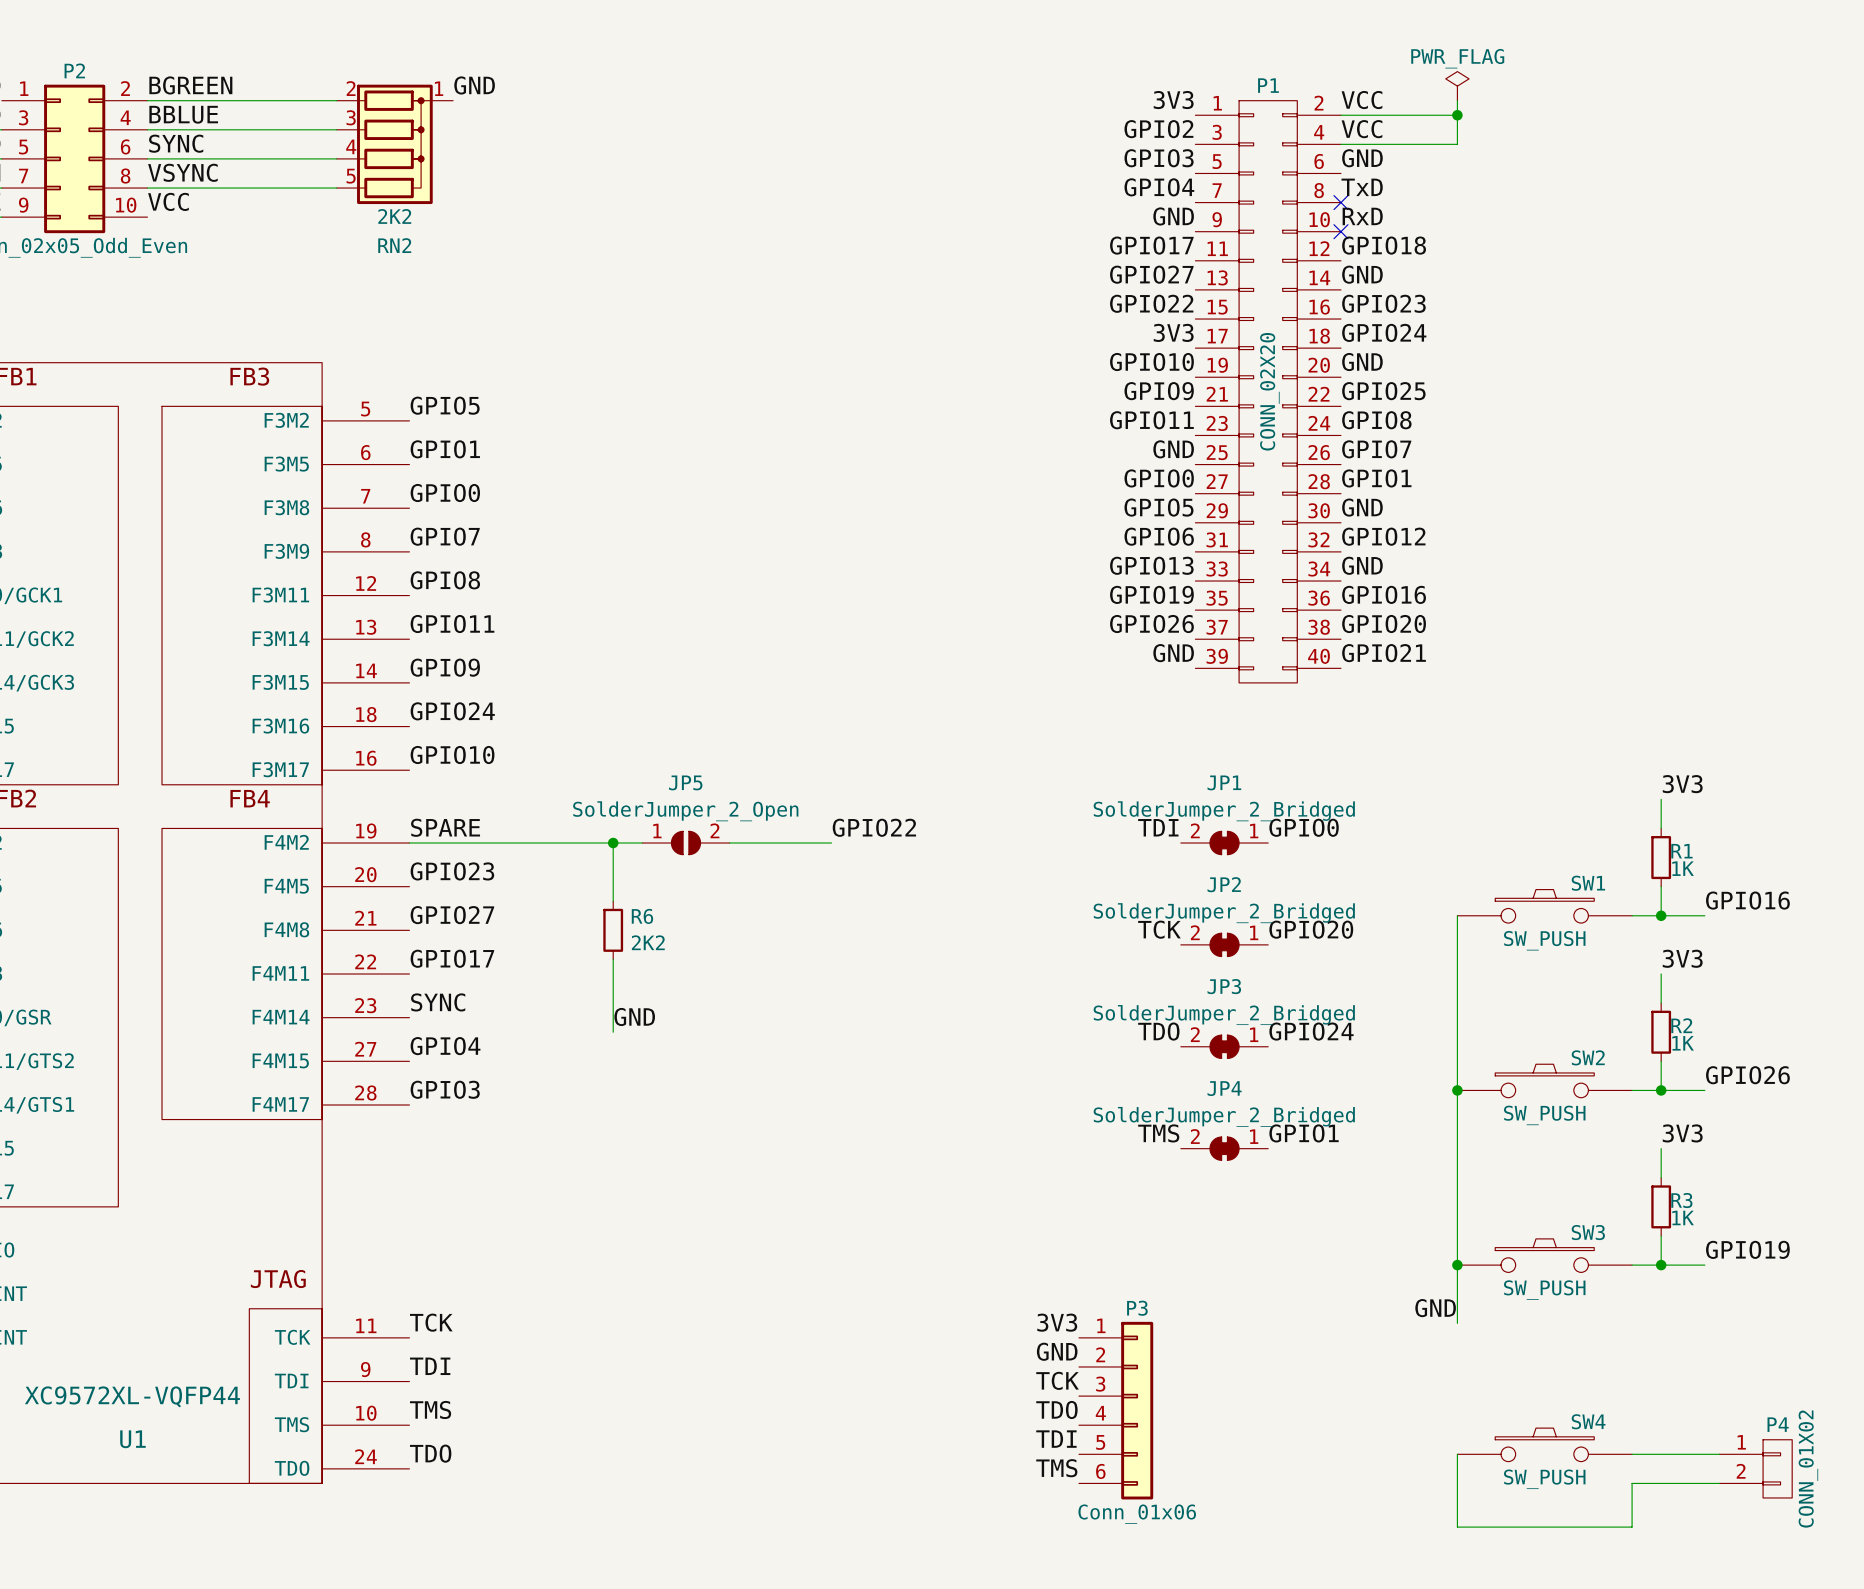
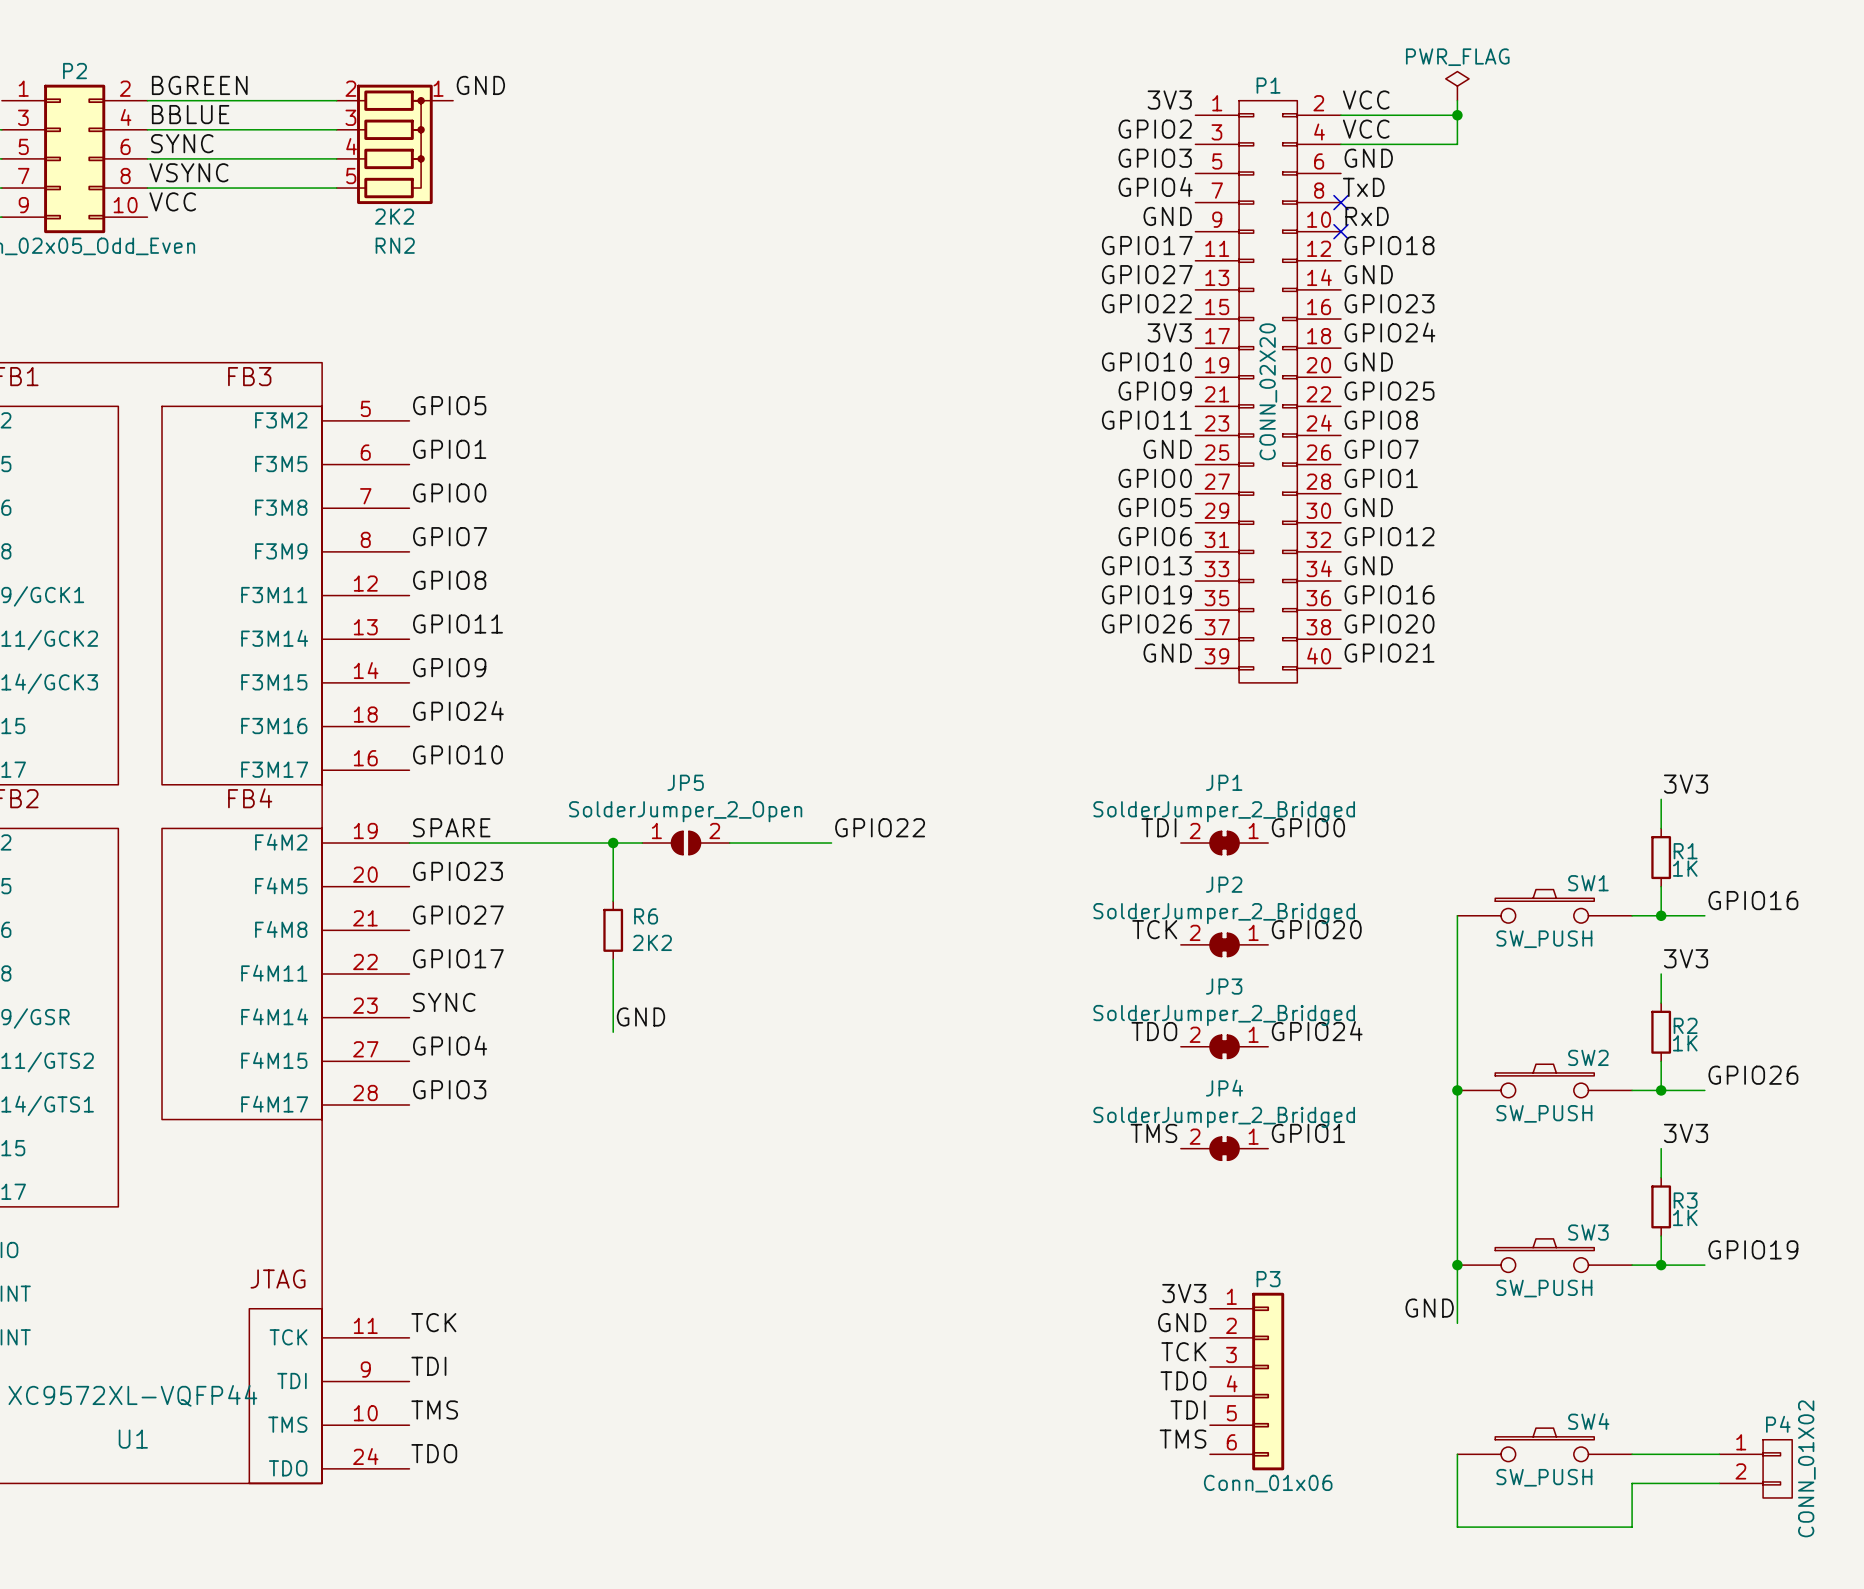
label position: 3V3 (1057, 1322) -> 3V3 (1184, 1293)
label position: GND (1057, 1351) -> GND (1182, 1322)
label position: TCK (1057, 1380) -> TCK (1183, 1351)
label position: TDO (1056, 1409) -> TDO (1183, 1380)
P3 position: (1116, 1410) -> (1247, 1381)
label position: TDI (1056, 1439) -> TDI (1188, 1409)
label position: TMS (1056, 1468) -> TMS (1183, 1439)

